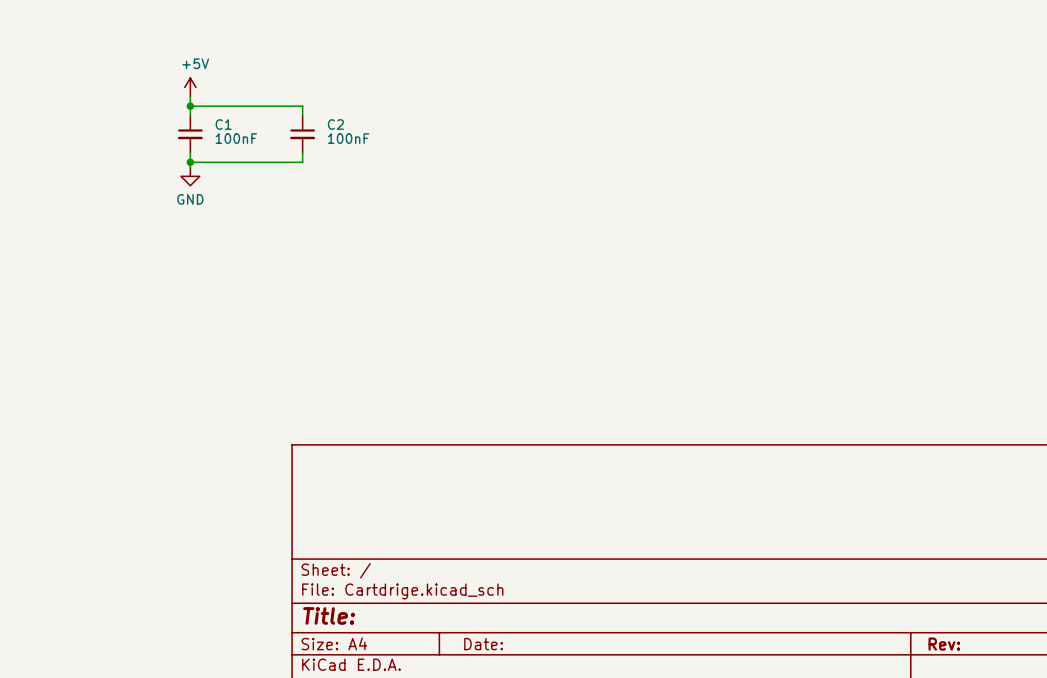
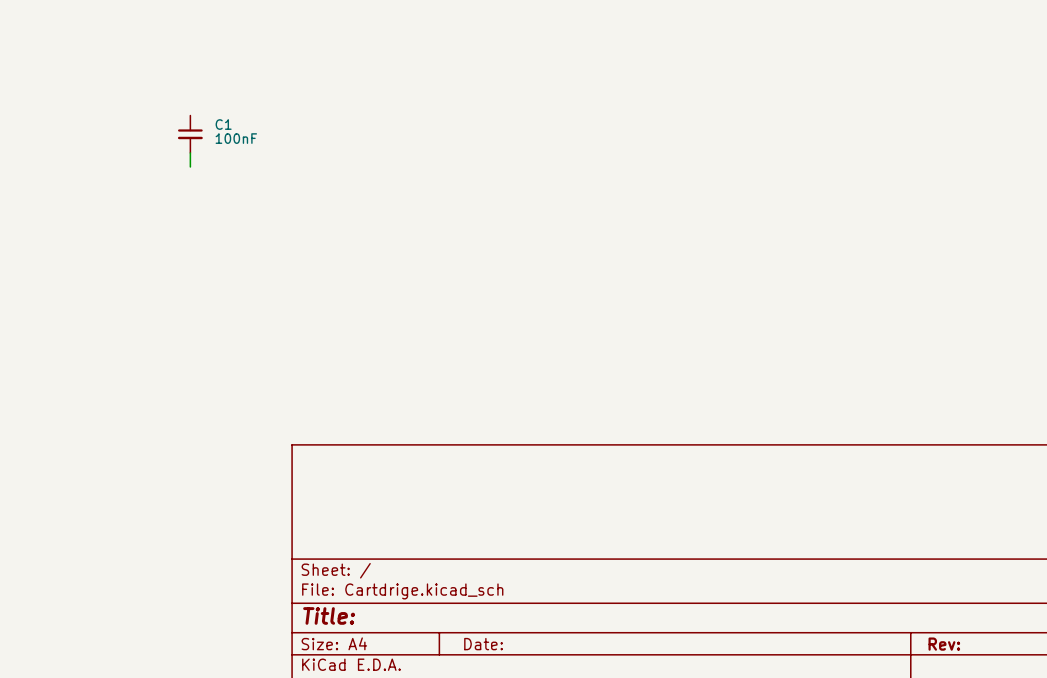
power symbol: +5V (190, 87) -> none
wire: (190, 96) (190, 115) -> none
wire: (190, 106) (302, 106) (302, 115) -> none
junction: (190, 106) -> none
C2: 100nF (302, 134) -> none
wire: (302, 152) (302, 162) (190, 162) -> none
junction: (190, 162) -> none
power symbol: GND (190, 176) -> none

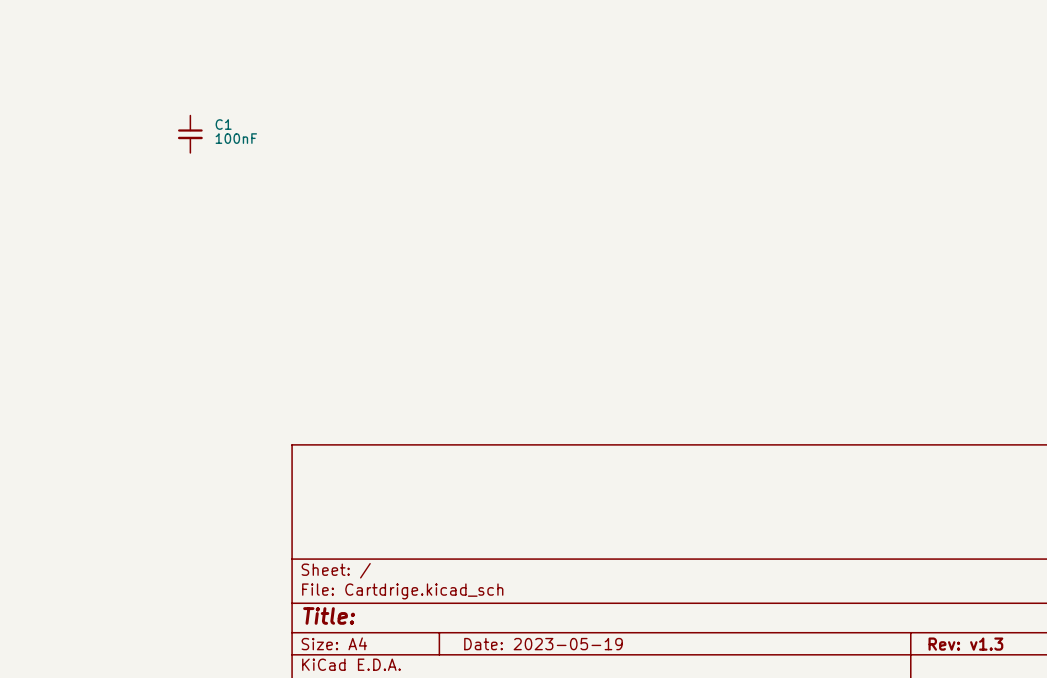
wire: (190, 152) (190, 166) -> none
title block: Date: (483, 644) -> Date: 2023-05-19 (543, 644)
title block: Rev: (944, 644) -> Rev: v1.3 (965, 644)

